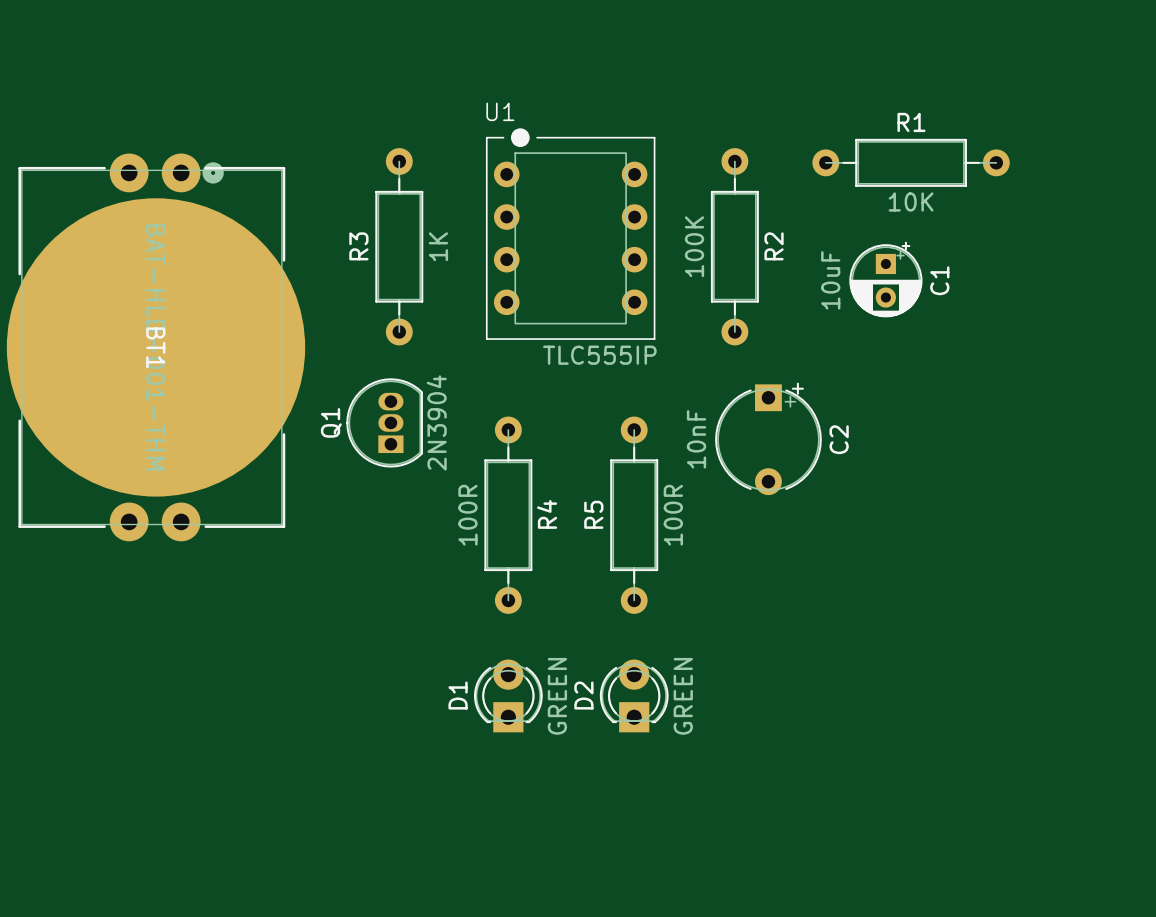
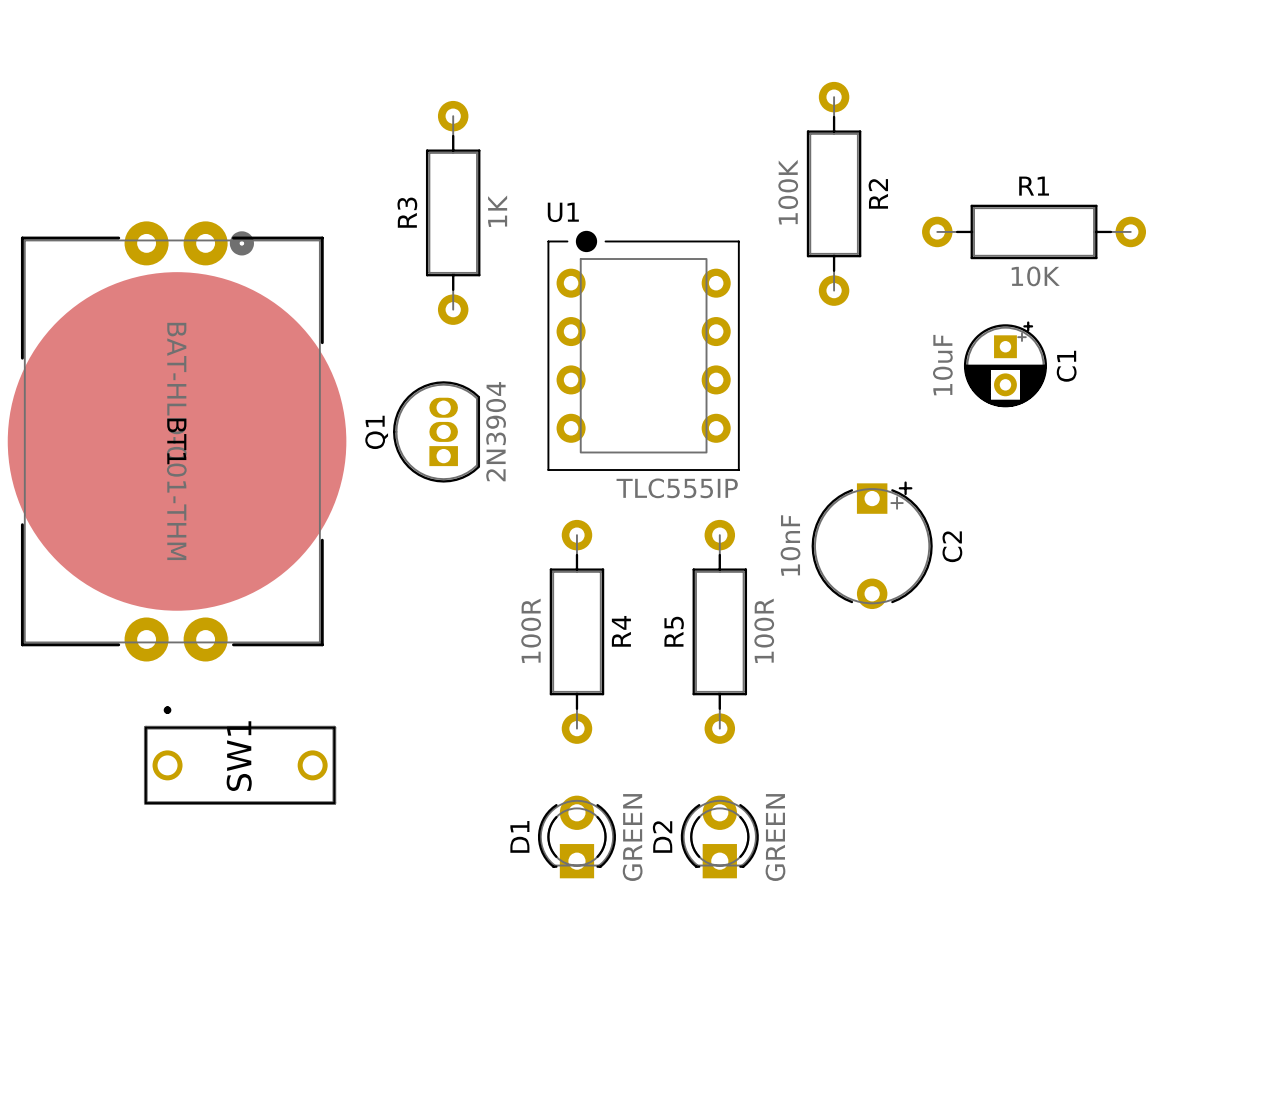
U1 position: (570, 234) -> (643, 350)
R3 position: (399, 246) -> (453, 212)
R2 position: (734, 246) -> (834, 193)
Q1 position: (384, 422) -> (436, 431)
SW1: none -> (240, 755)

